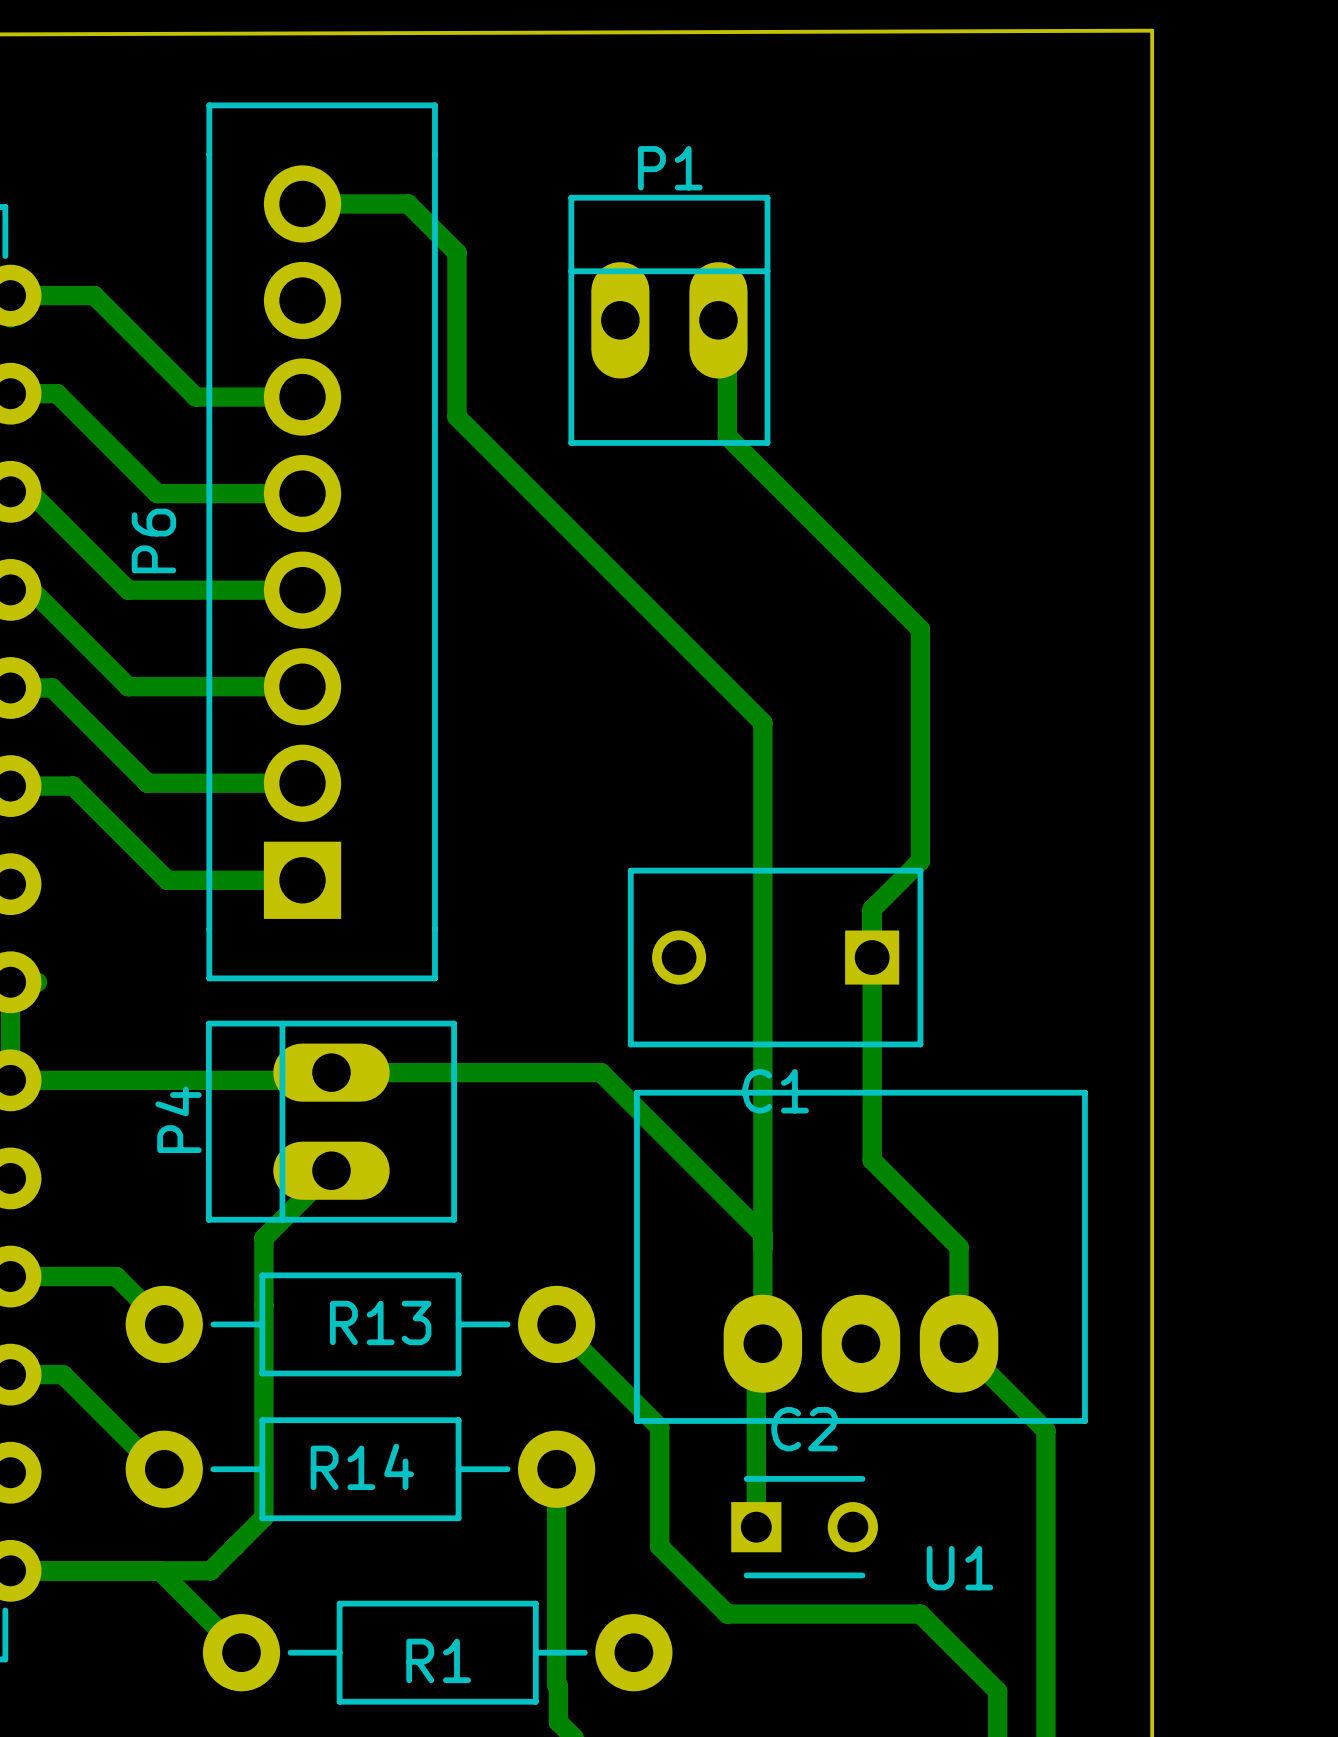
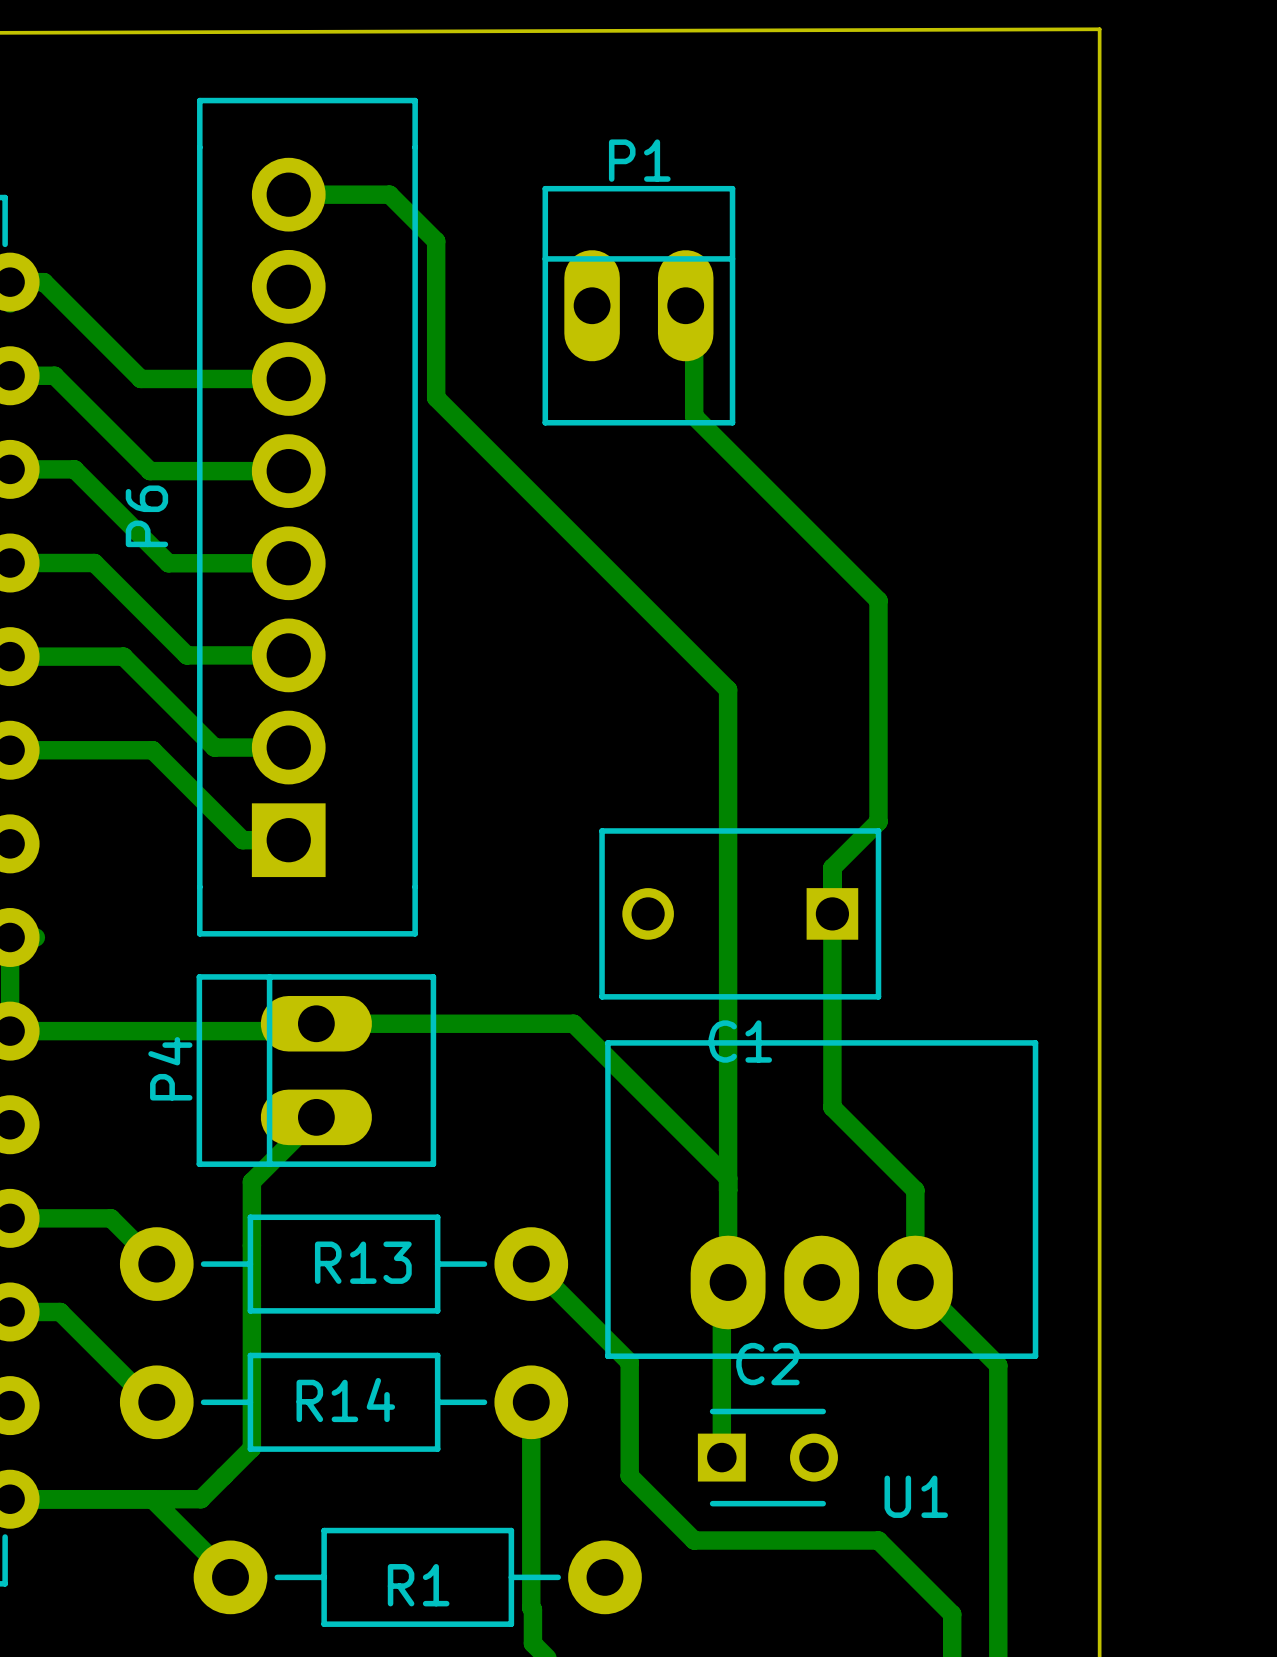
bottom track: (46, 295) (94, 295) (195, 397) -> (44, 282) (140, 378) (186, 378)
bottom track: (29, 491) (128, 590) (176, 590) -> (28, 469) (74, 469) (168, 563)
bottom track: (31, 589) (128, 686) (195, 686) -> (29, 563) (94, 563) (186, 655)
bottom track: (52, 687) (147, 783) (224, 783) -> (49, 656) (123, 656) (214, 747)
bottom track: (73, 786) (167, 880) (254, 880) -> (69, 750) (152, 750) (242, 840)

